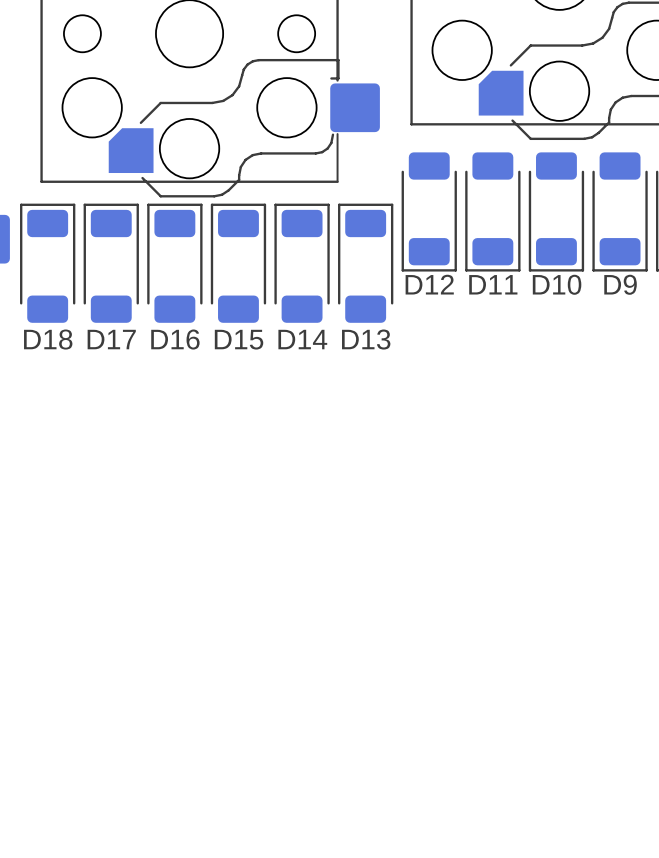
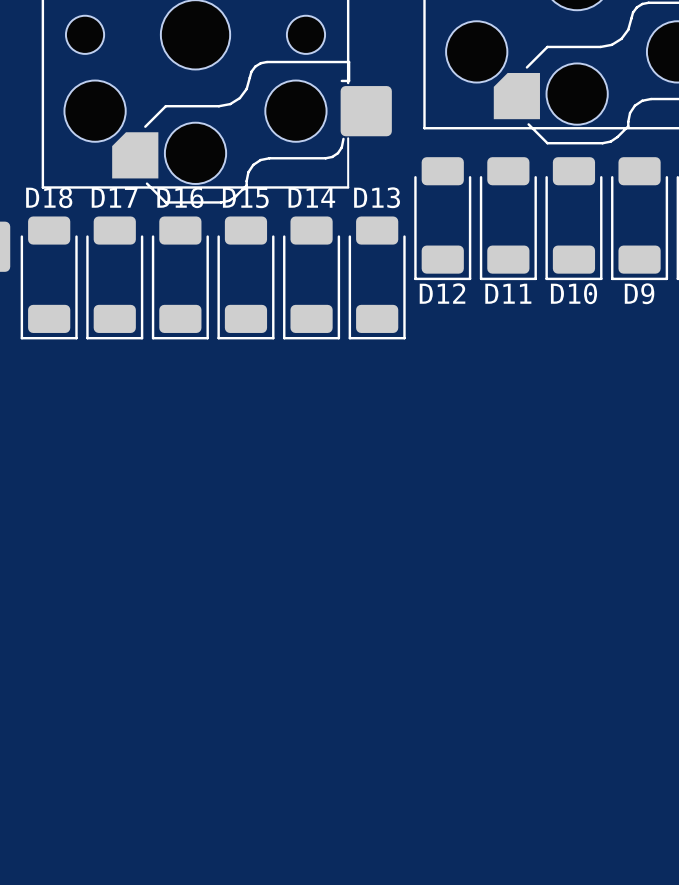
D18 rotation: 0° (47, 263) -> 180° (49, 277)
D17 rotation: 0° (111, 263) -> 180° (114, 277)
D16 rotation: 0° (174, 263) -> 180° (180, 277)
D15 rotation: 0° (238, 263) -> 180° (245, 277)
D14 rotation: 0° (302, 263) -> 180° (311, 277)
D13 rotation: 0° (365, 263) -> 180° (377, 277)

